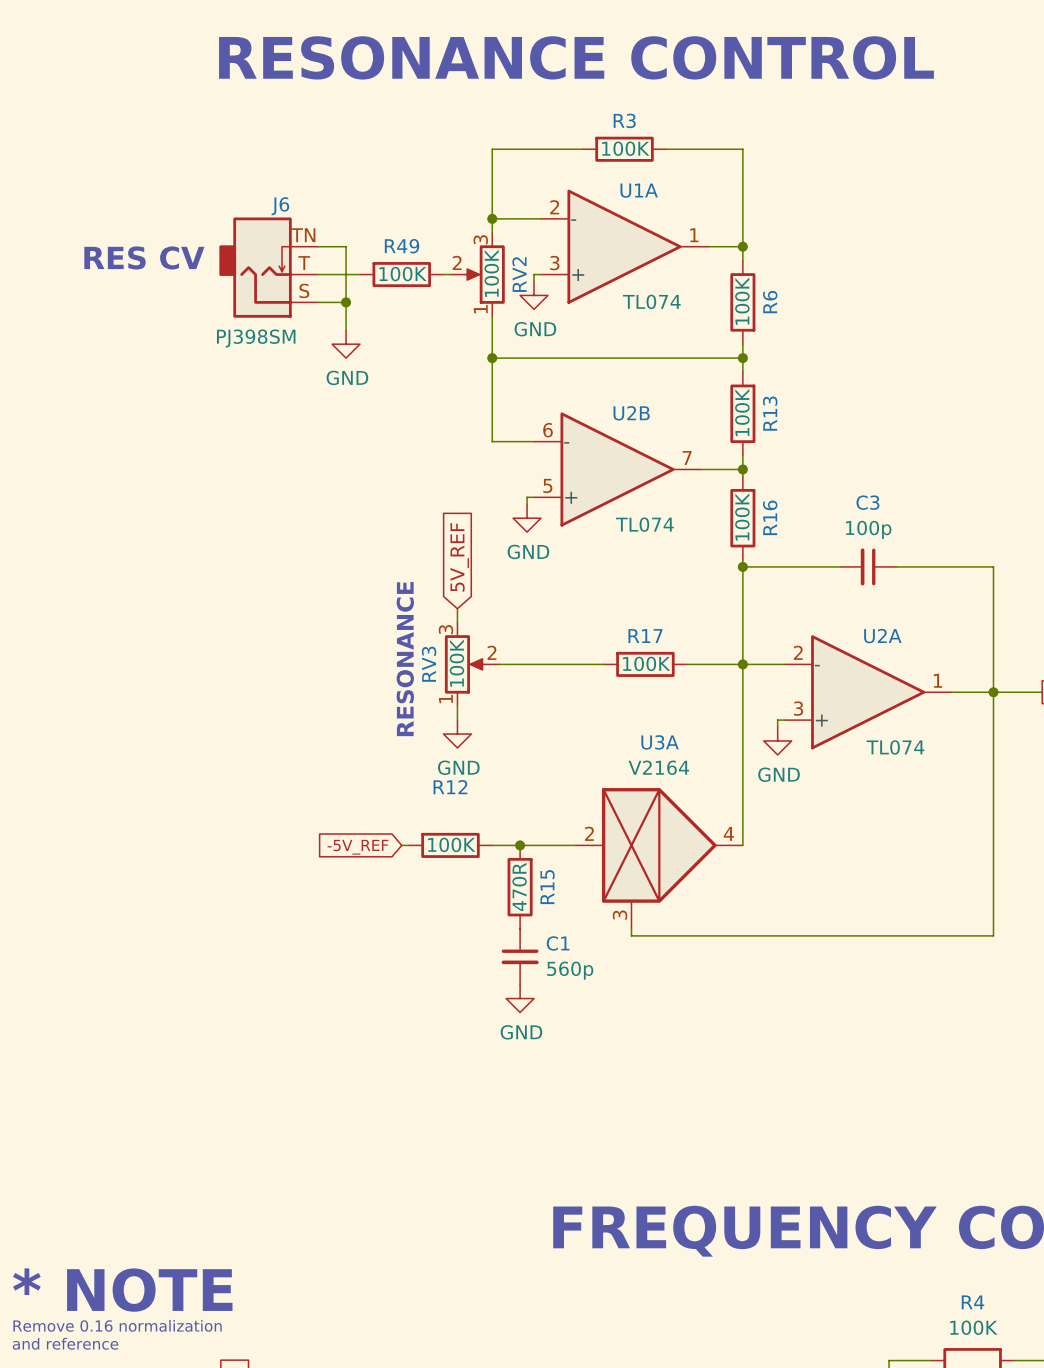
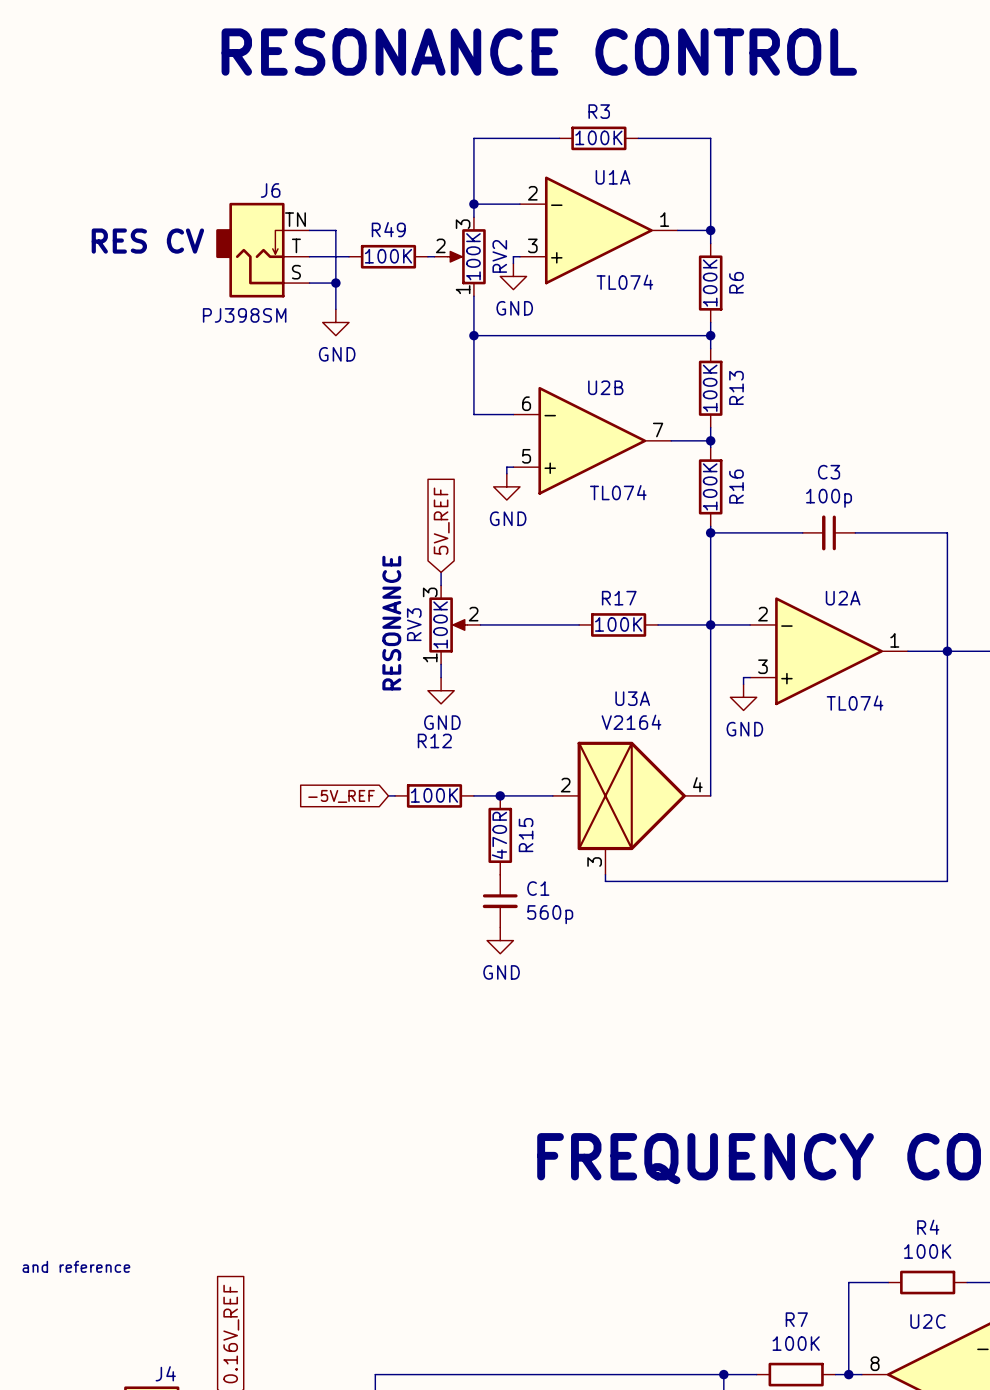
text: * NOTE (122, 1290) -> none
text: Remove 0.16 normalization (117, 1325) -> none

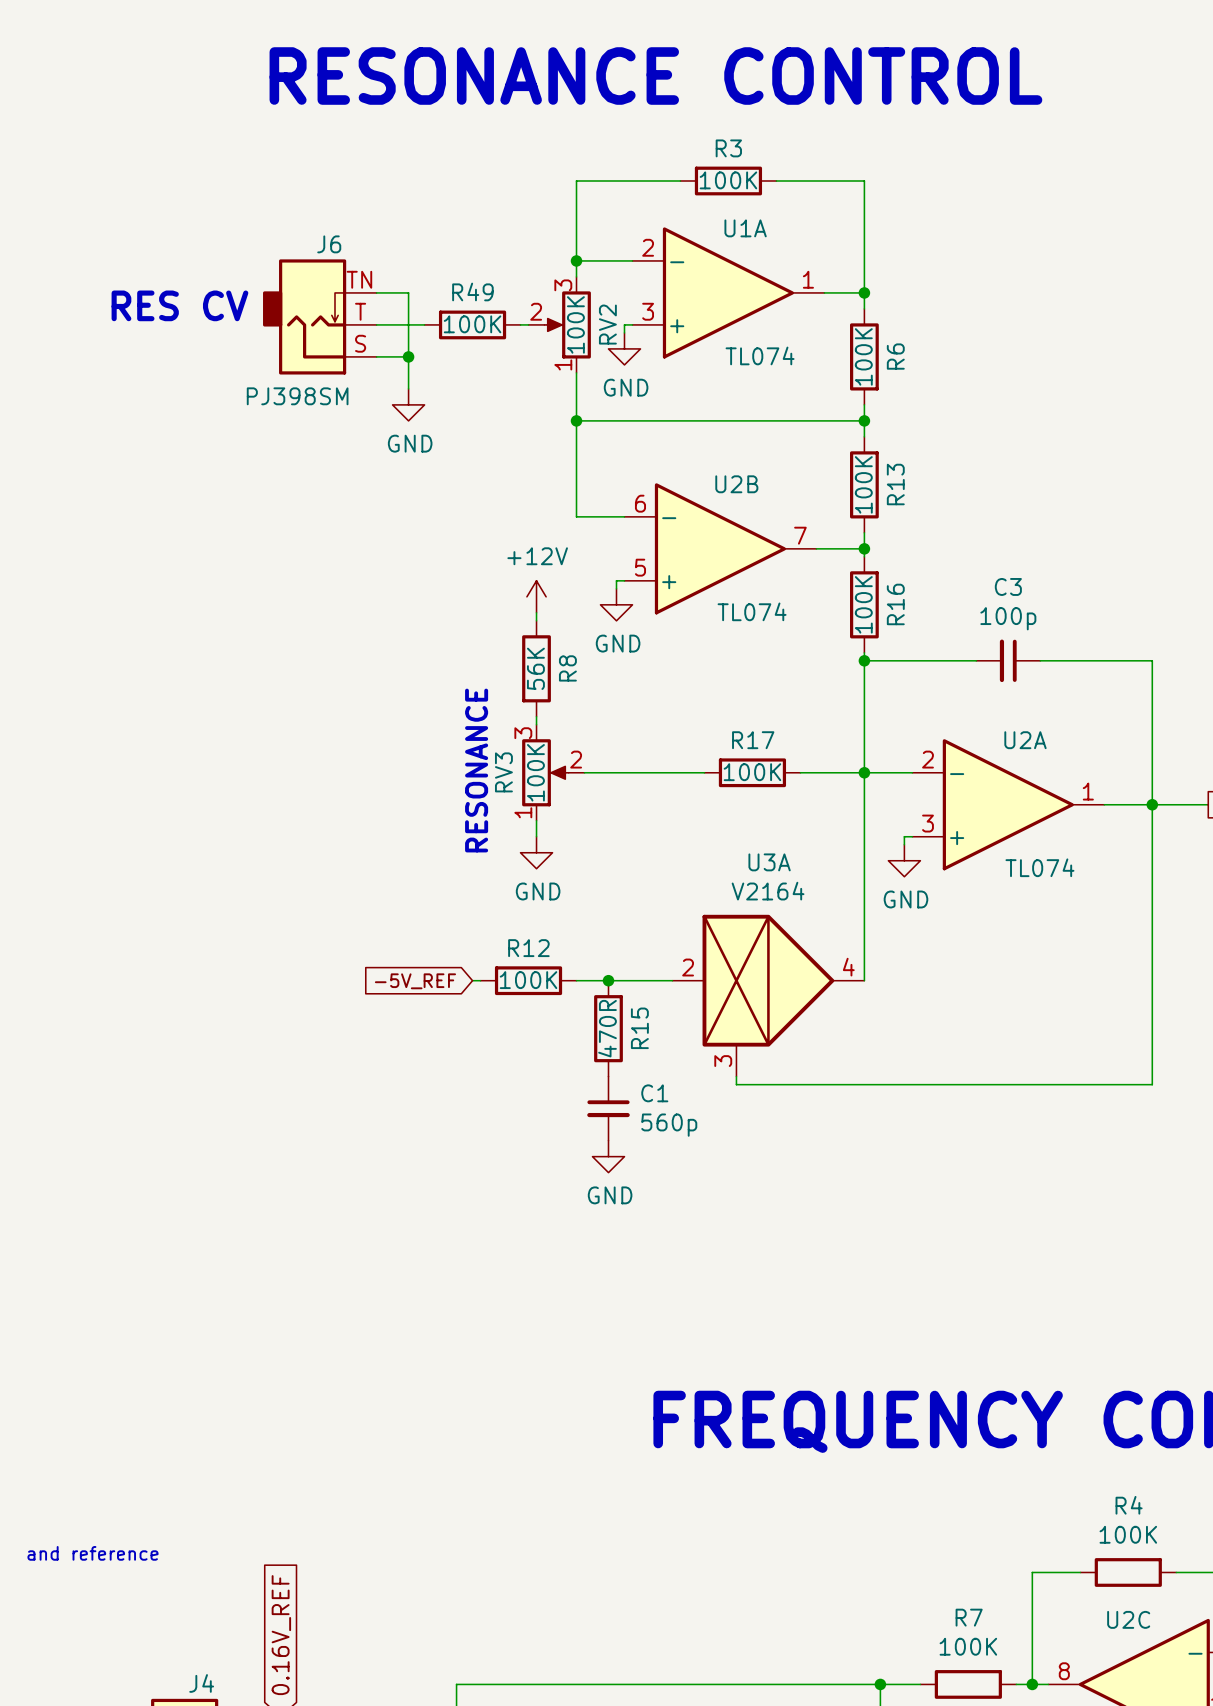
power symbol: none -> +12V (536, 596)
global label: 5V_REF (441, 521) -> none
R8: none -> 56K (536, 668)
R12 name position: R12 (434, 741) -> R12 (528, 948)

